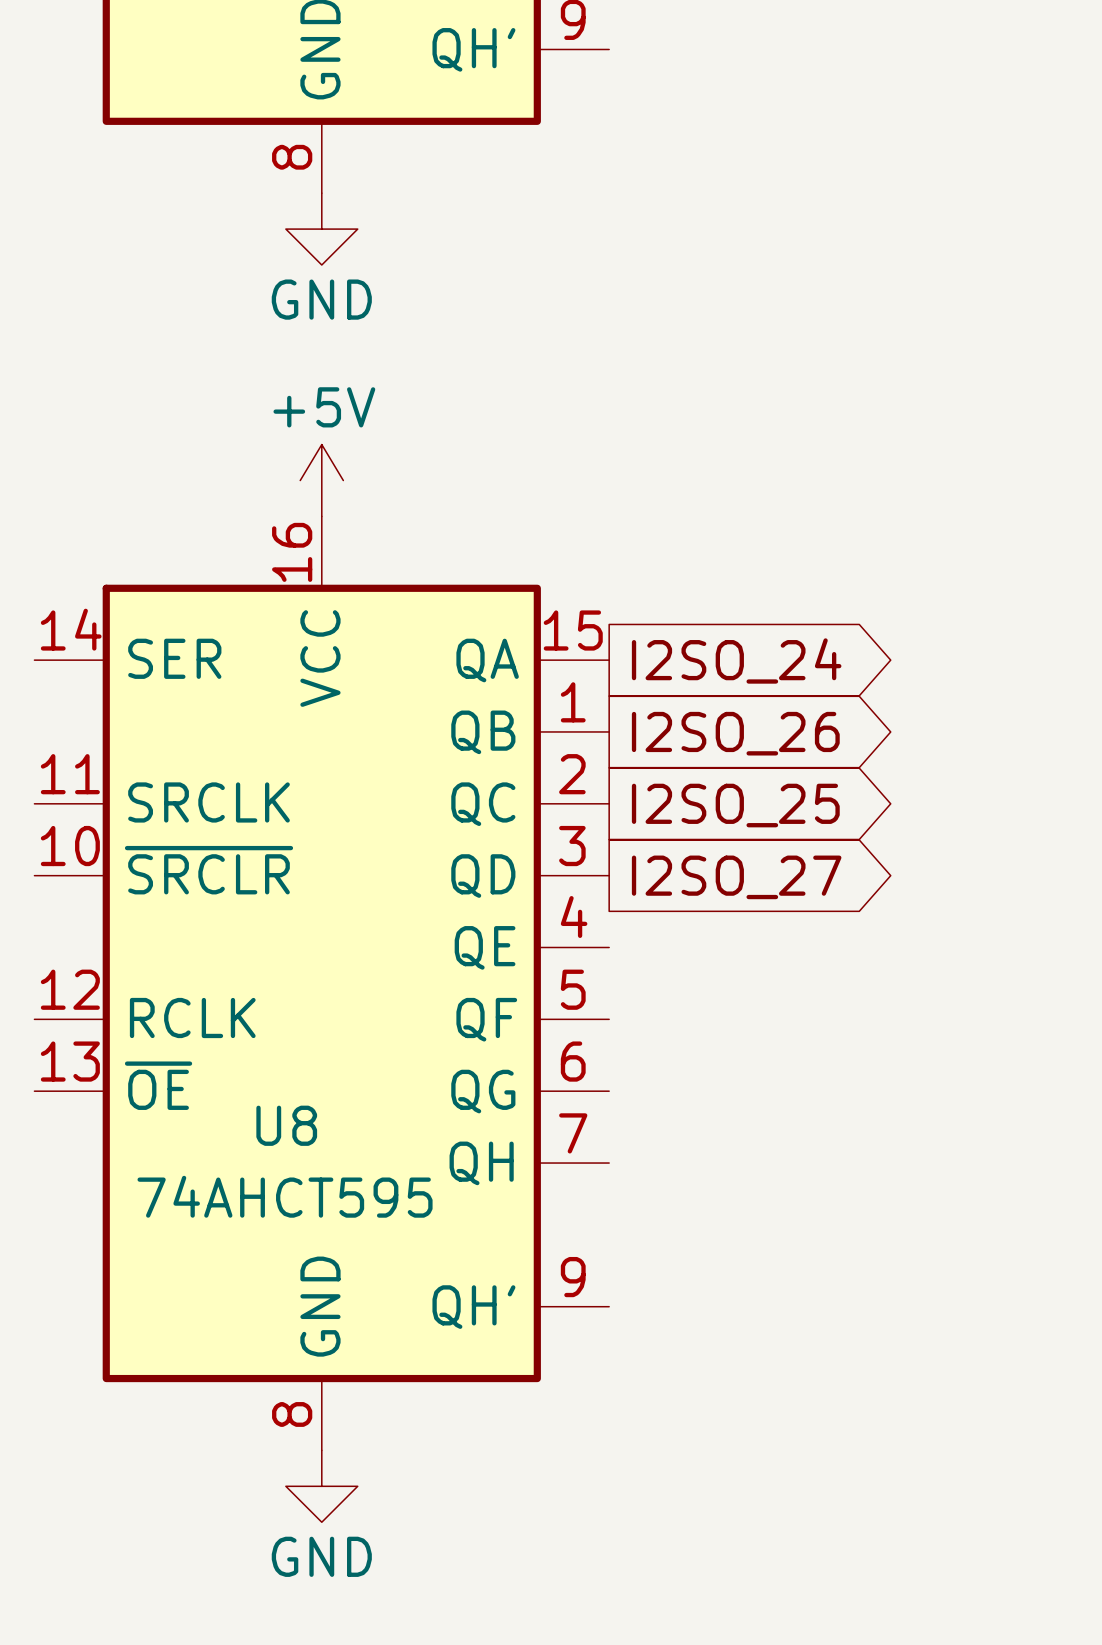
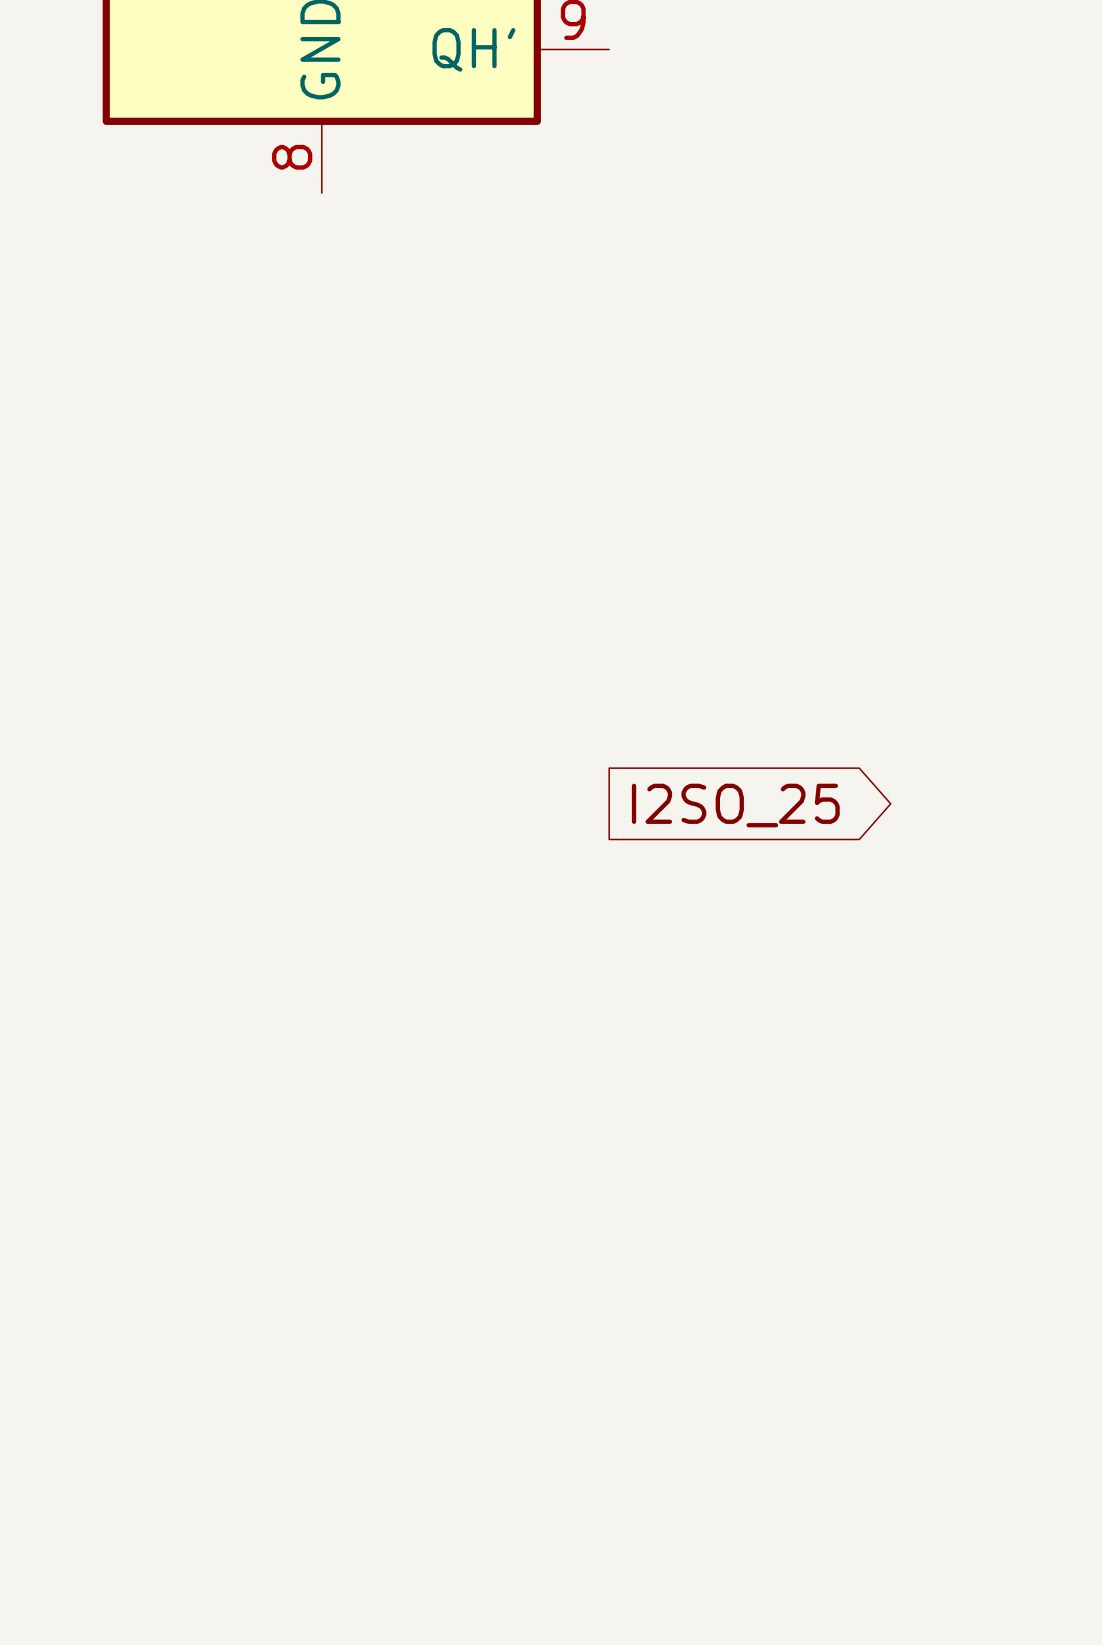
power symbol: GND (321, 229) -> none
power symbol: +5V (321, 480) -> none
global label: I2SO_24 (736, 660) -> none
global label: I2SO_26 (735, 733) -> none
global label: I2SO_27 (736, 877) -> none
U8: 74AHCT595 (321, 983) -> none
power symbol: GND (321, 1486) -> none

